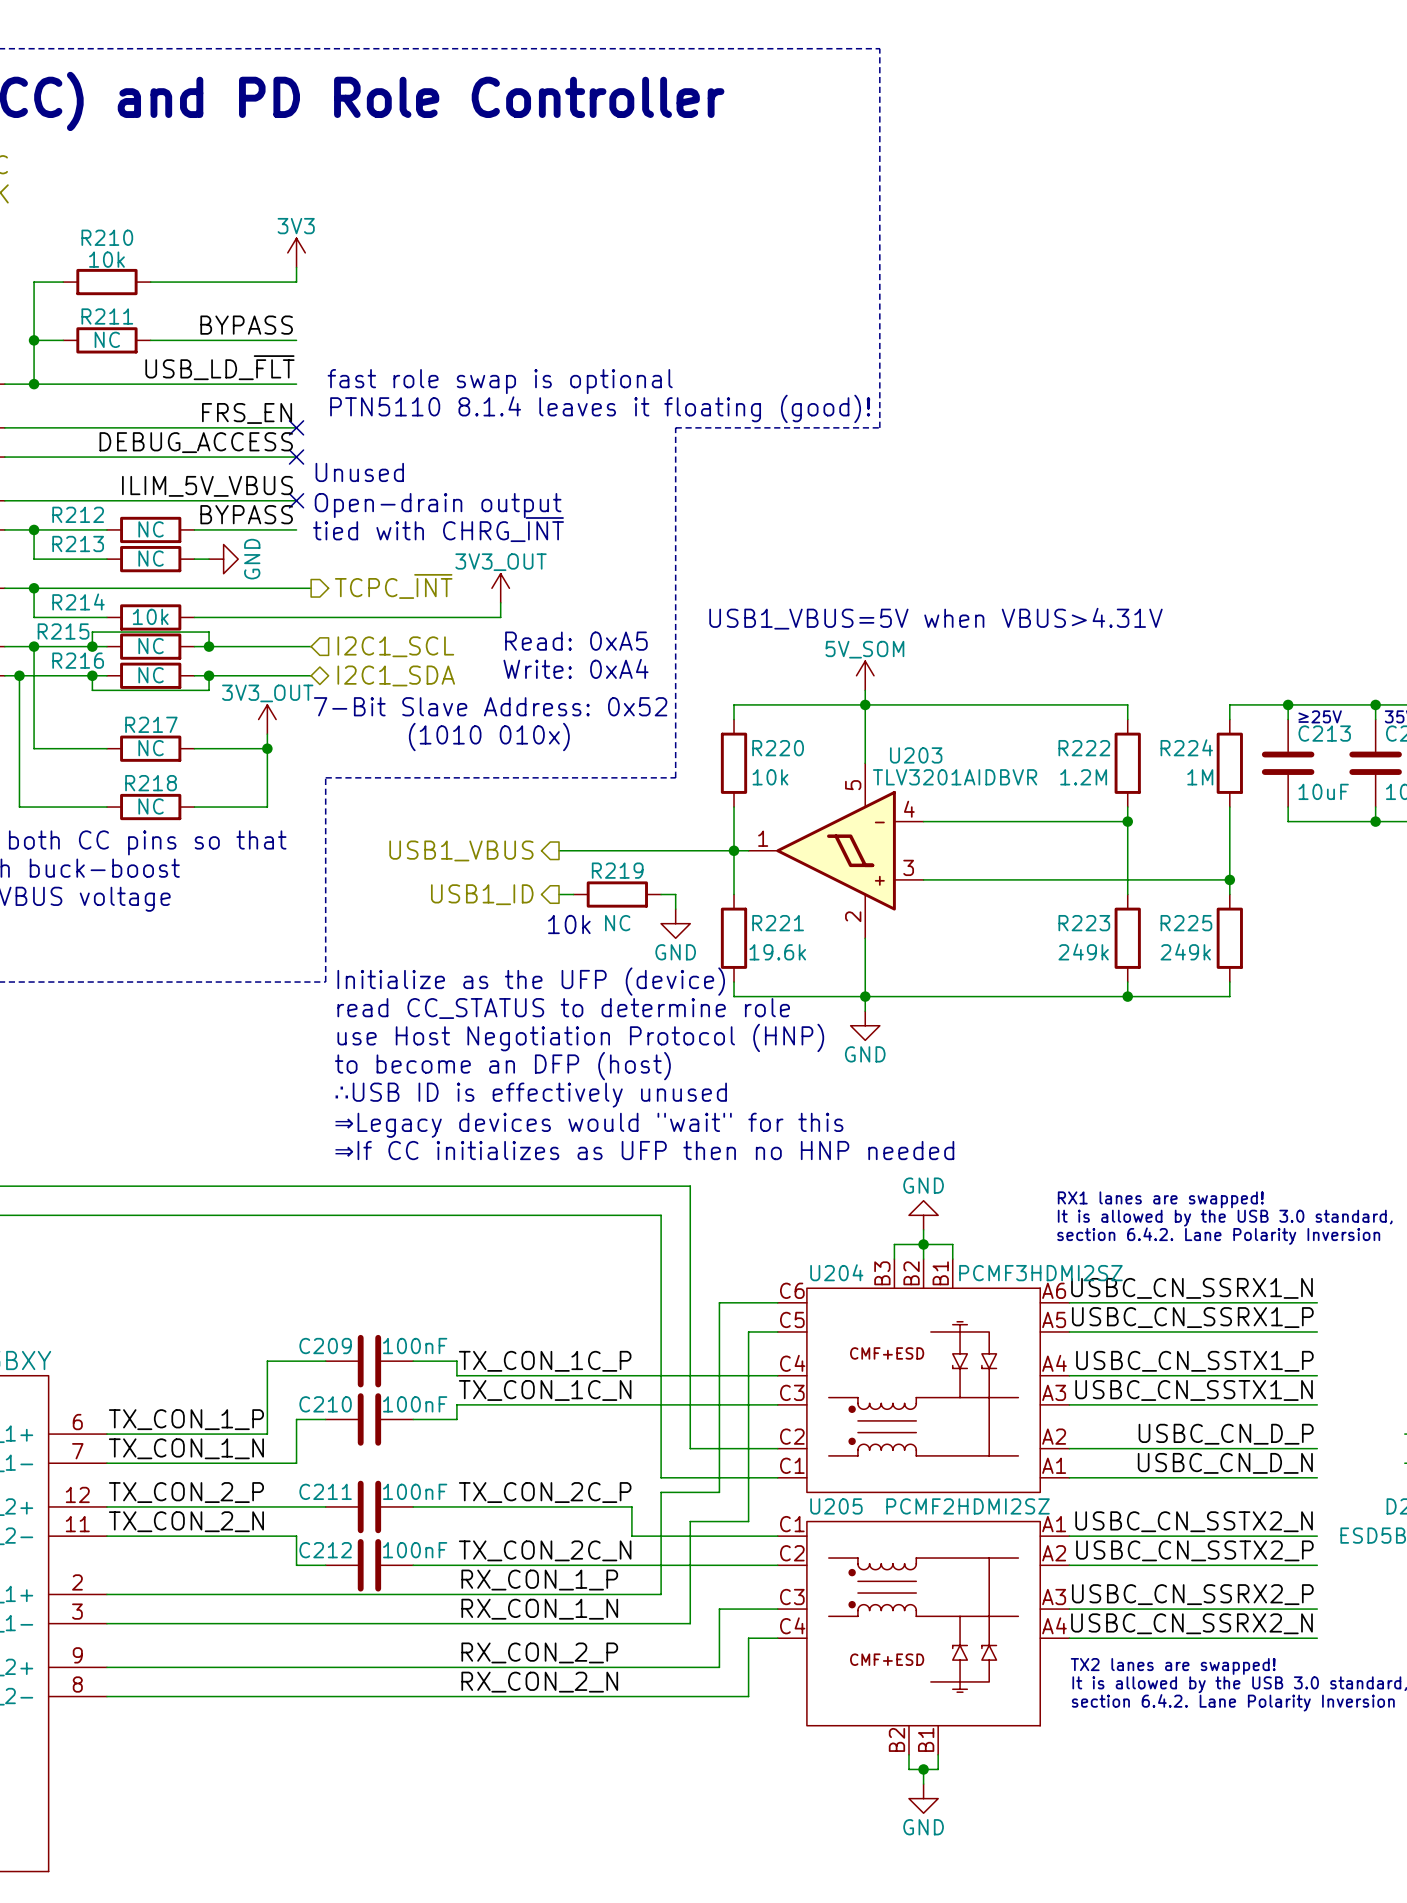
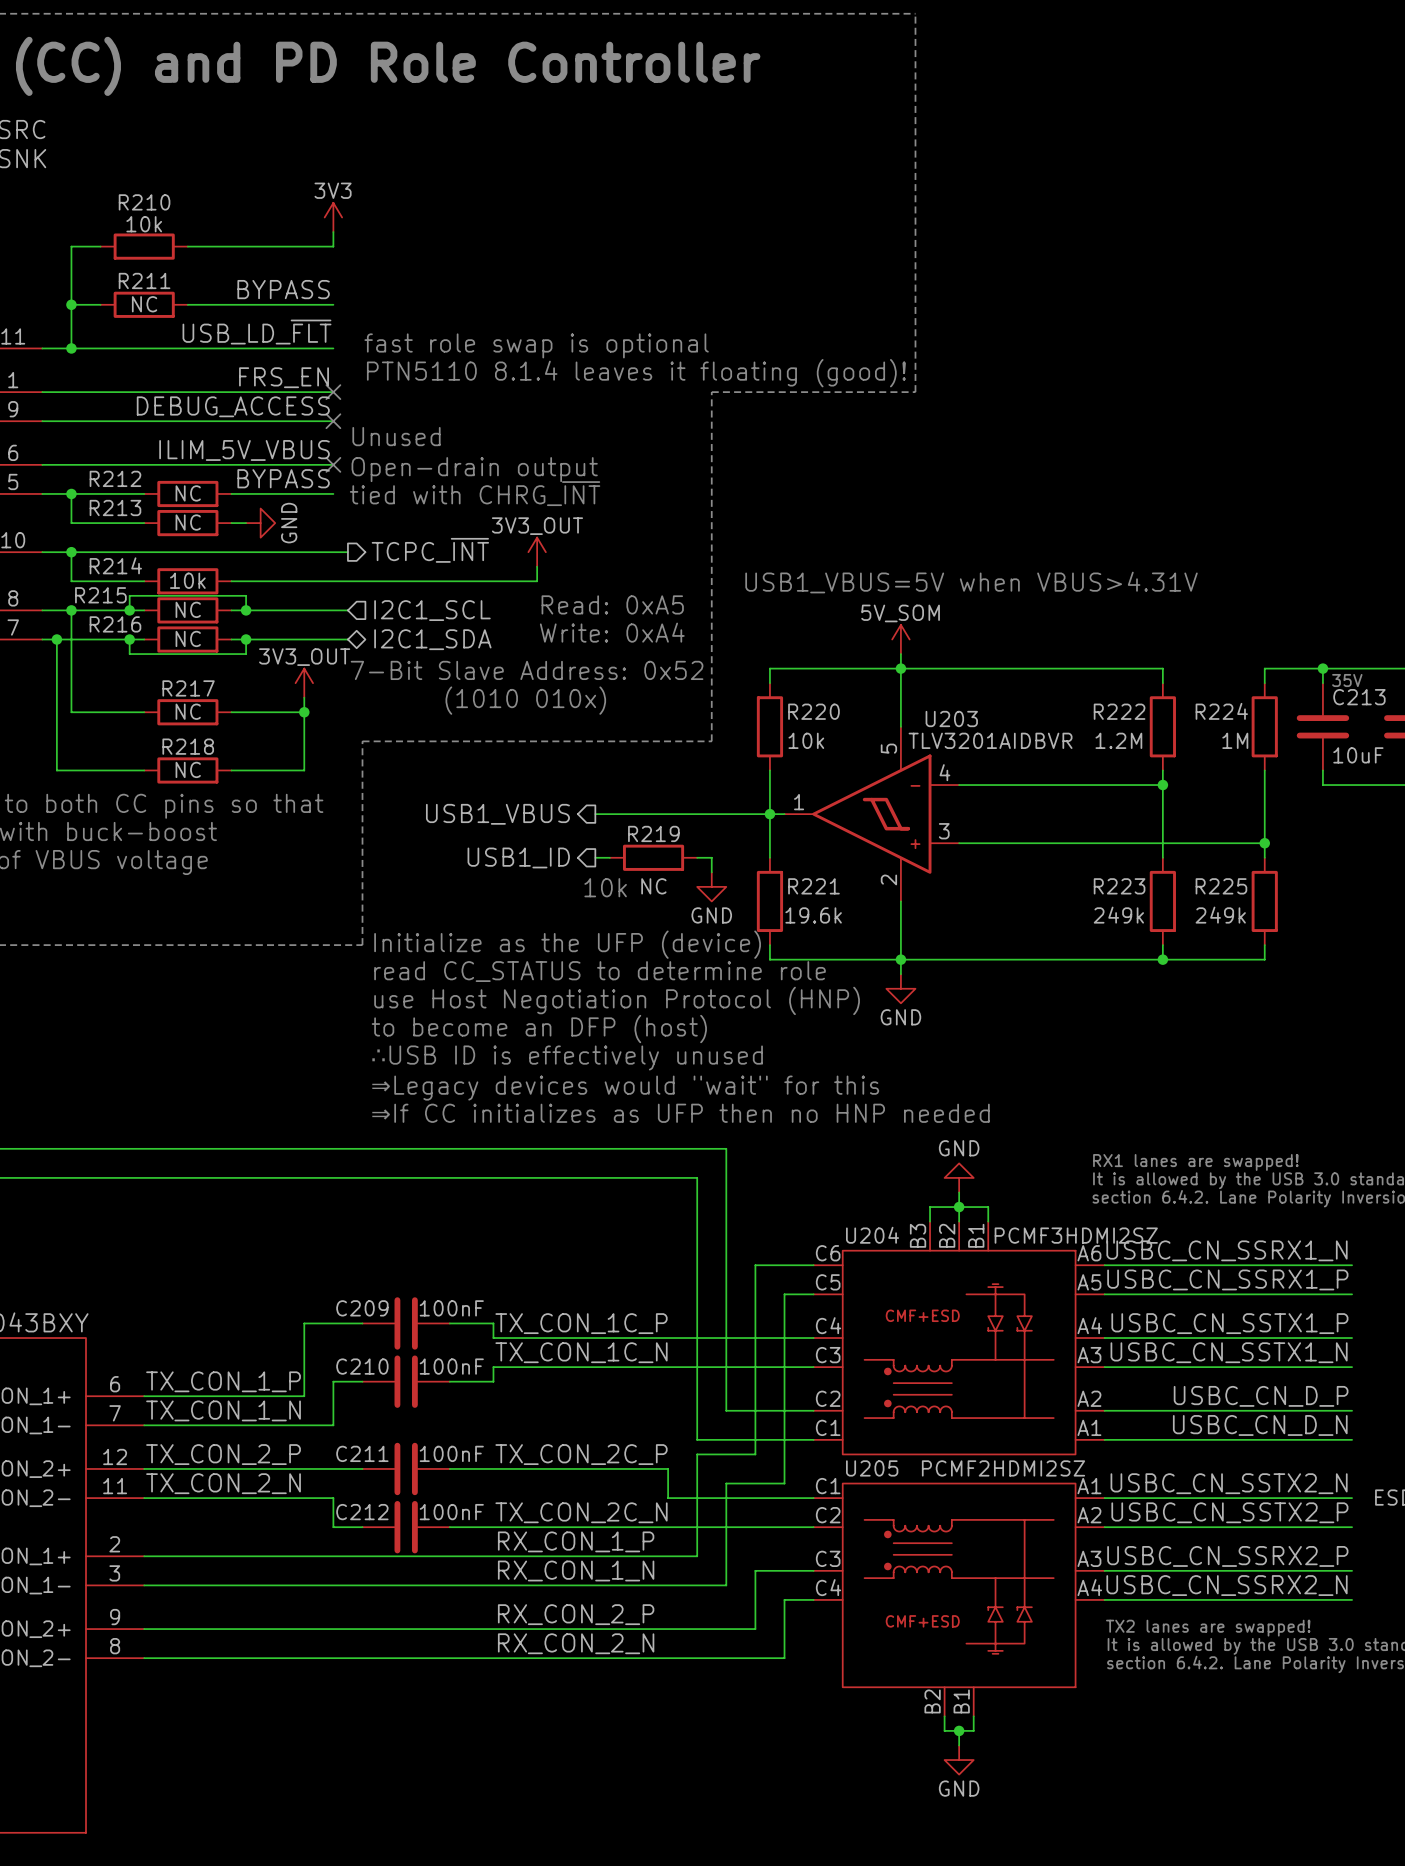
text: ≥25V (1320, 716) -> 35V (1347, 680)

